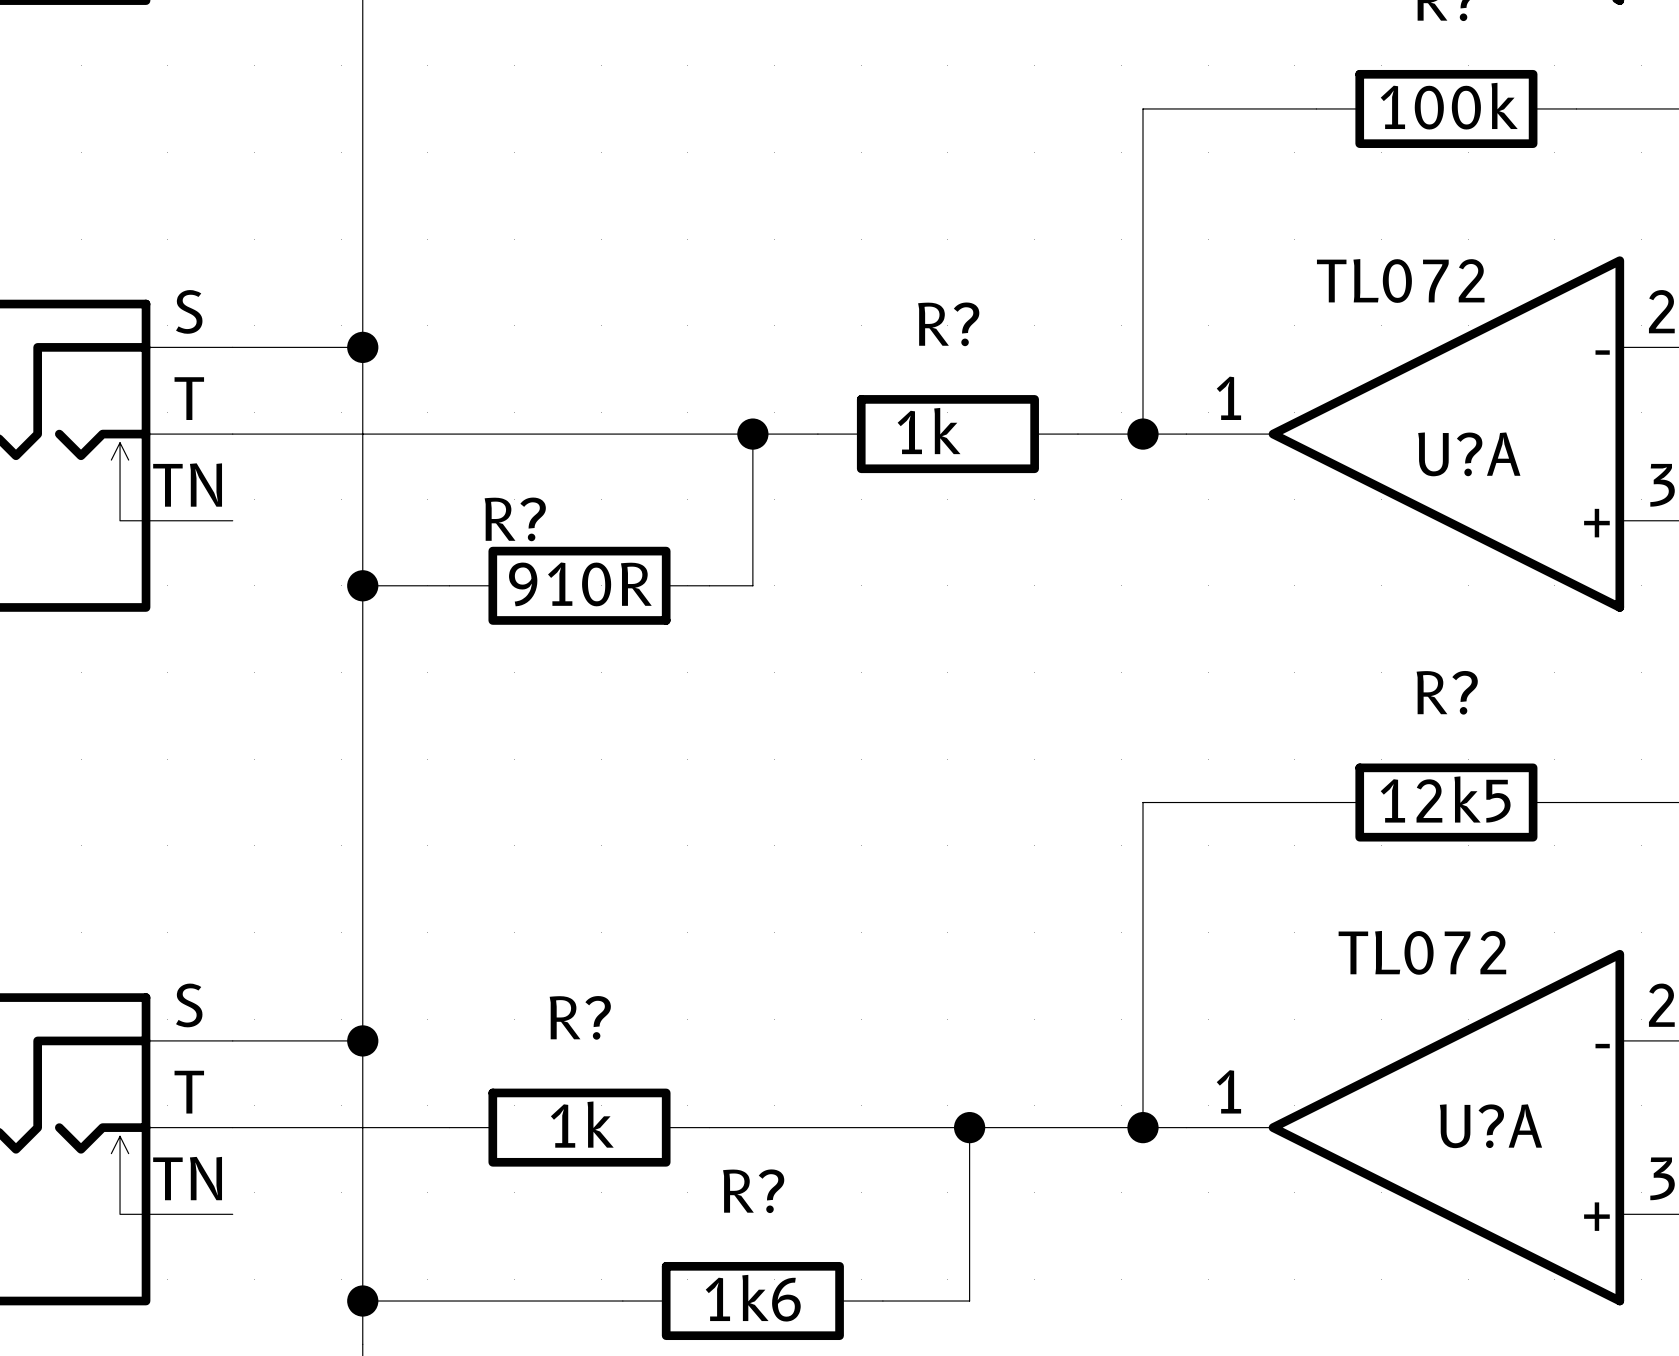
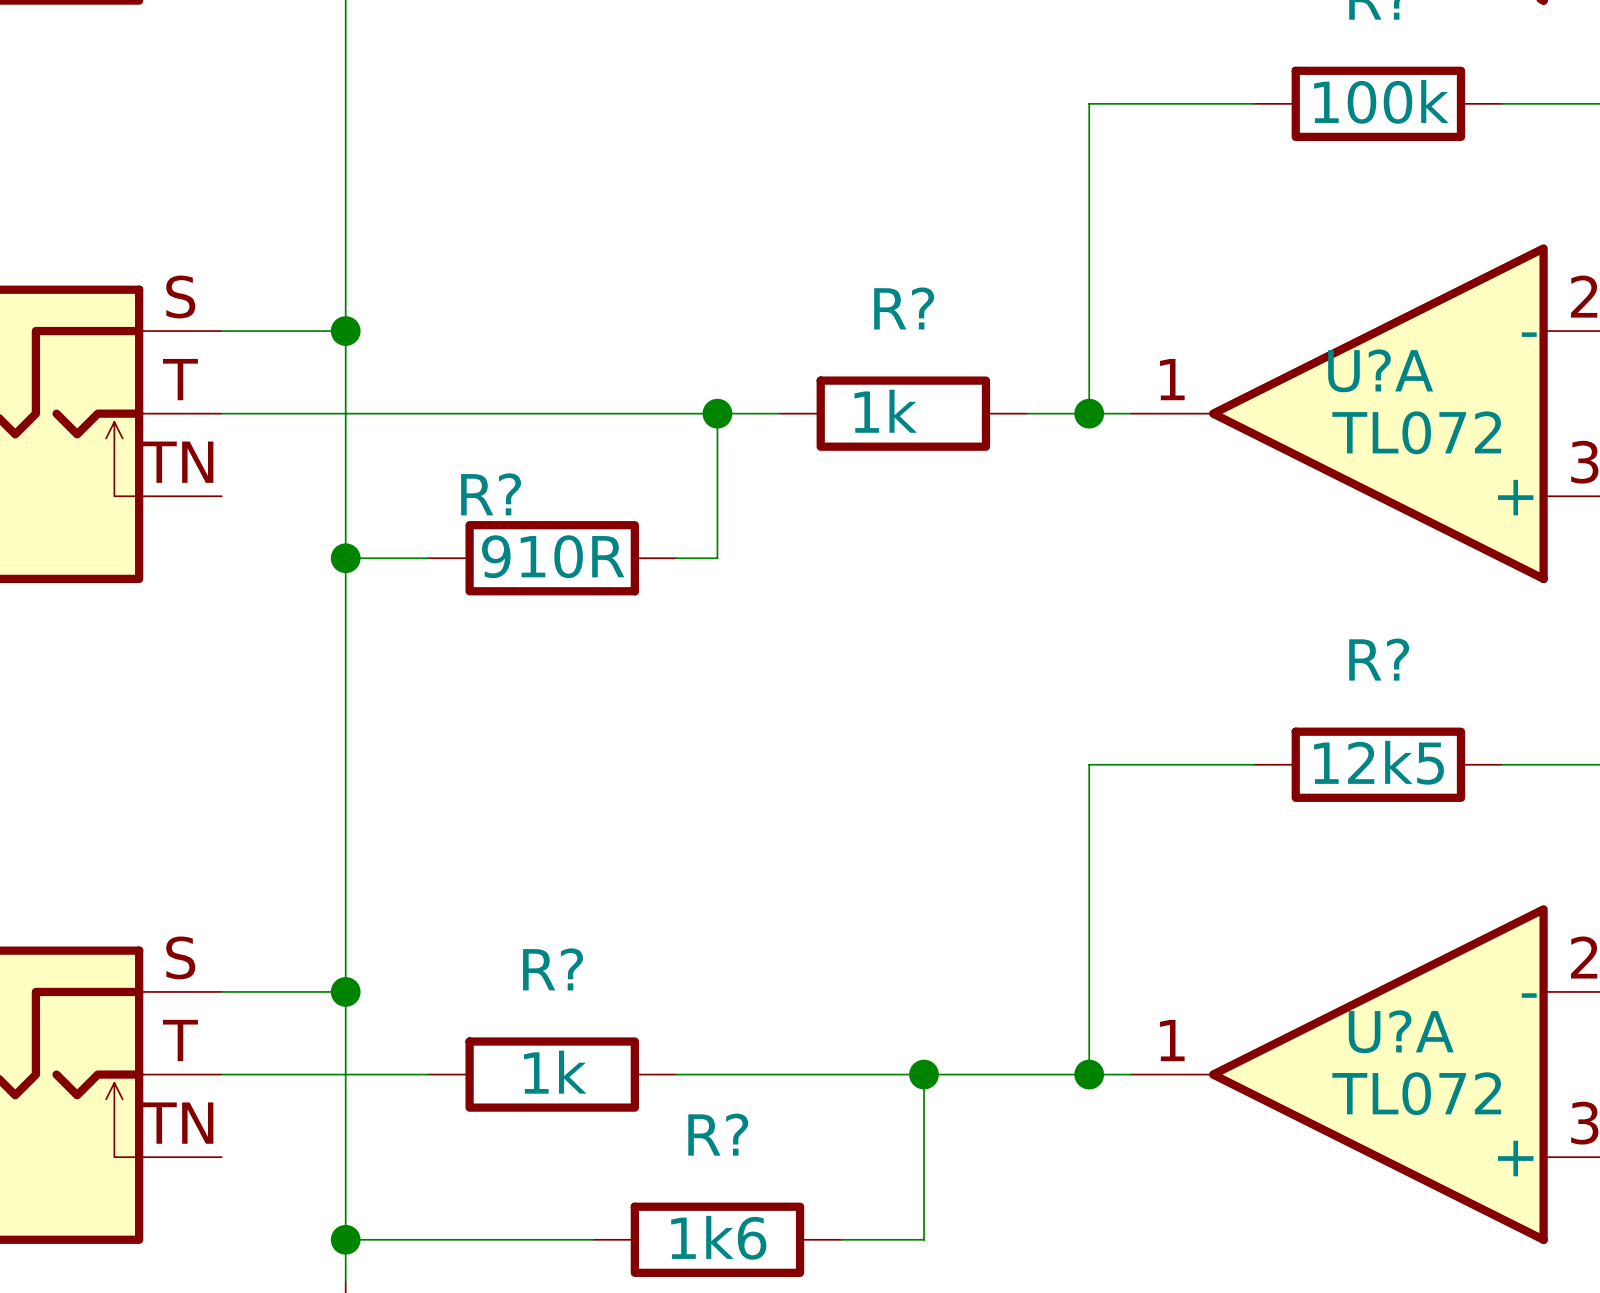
U?A value position: TL072 (1400, 280) -> TL072 (1416, 432)
U?A name position: U?A (1469, 454) -> U?A (1380, 370)
U?A value position: TL072 (1422, 952) -> TL072 (1416, 1093)
U?A name position: U?A (1490, 1126) -> U?A (1401, 1031)

